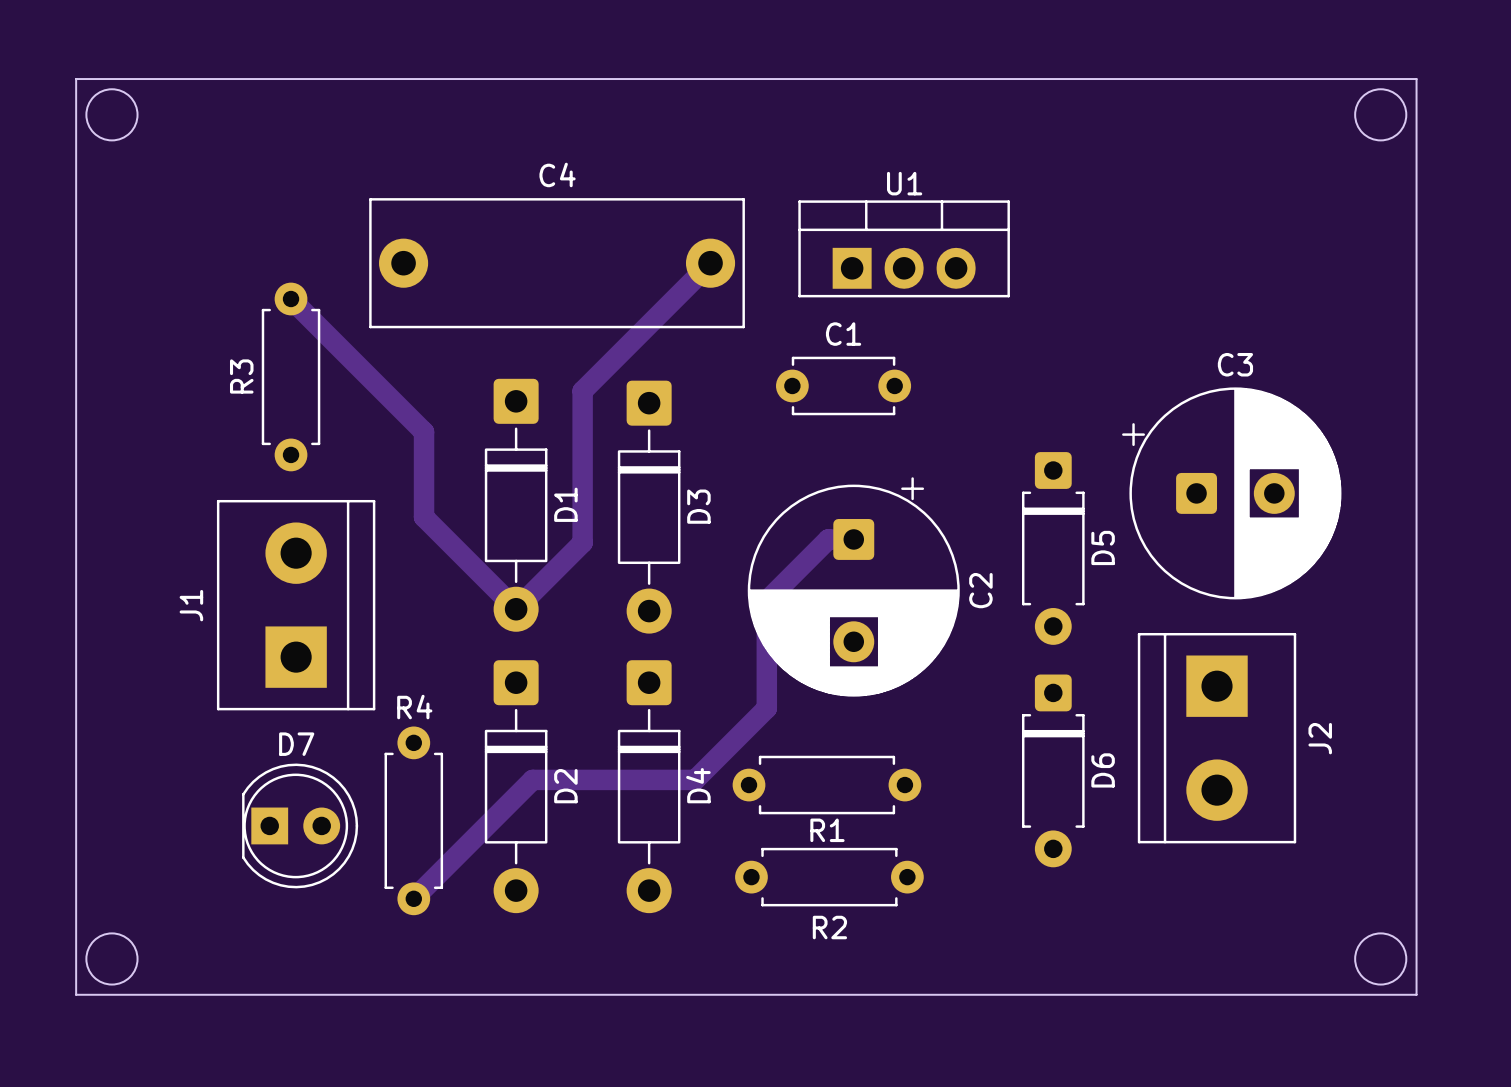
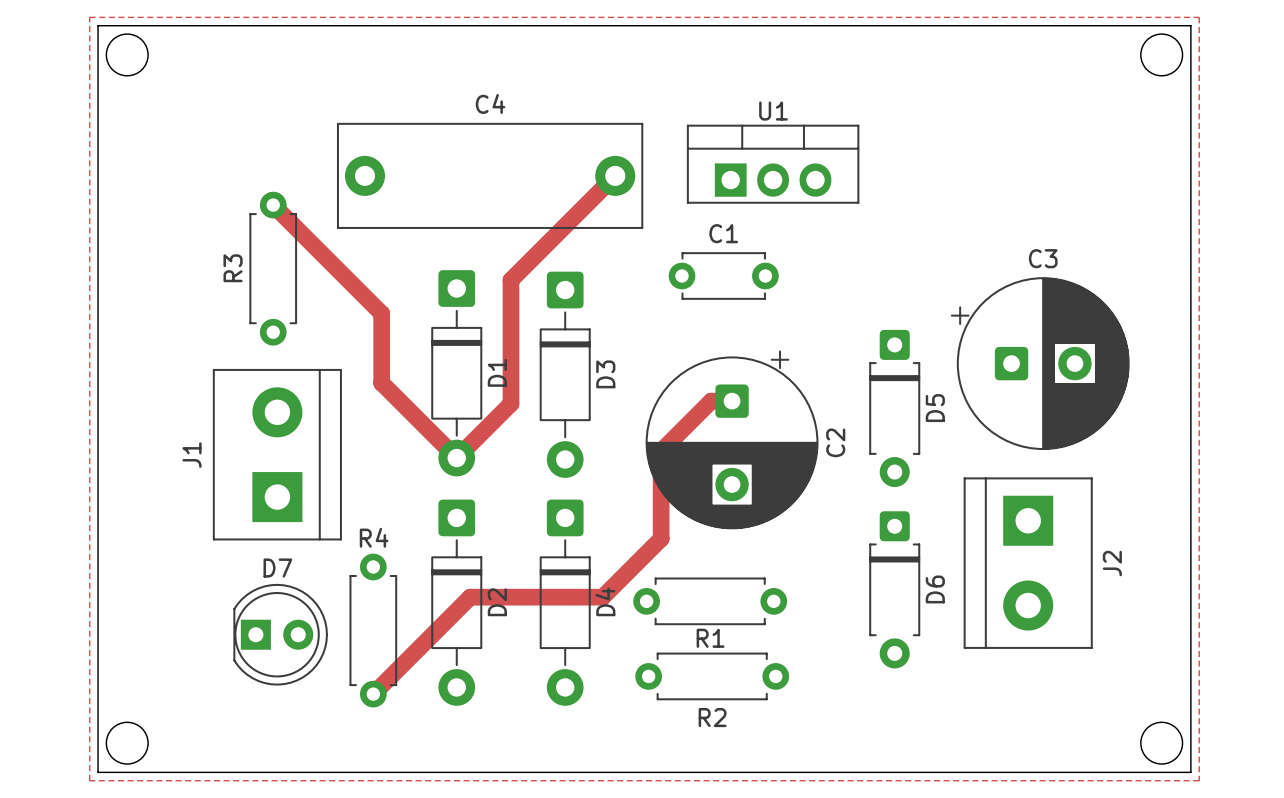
zone outline: none -> (89, 17) (1199, 17) (1199, 780) (89, 780) (89, 17)

